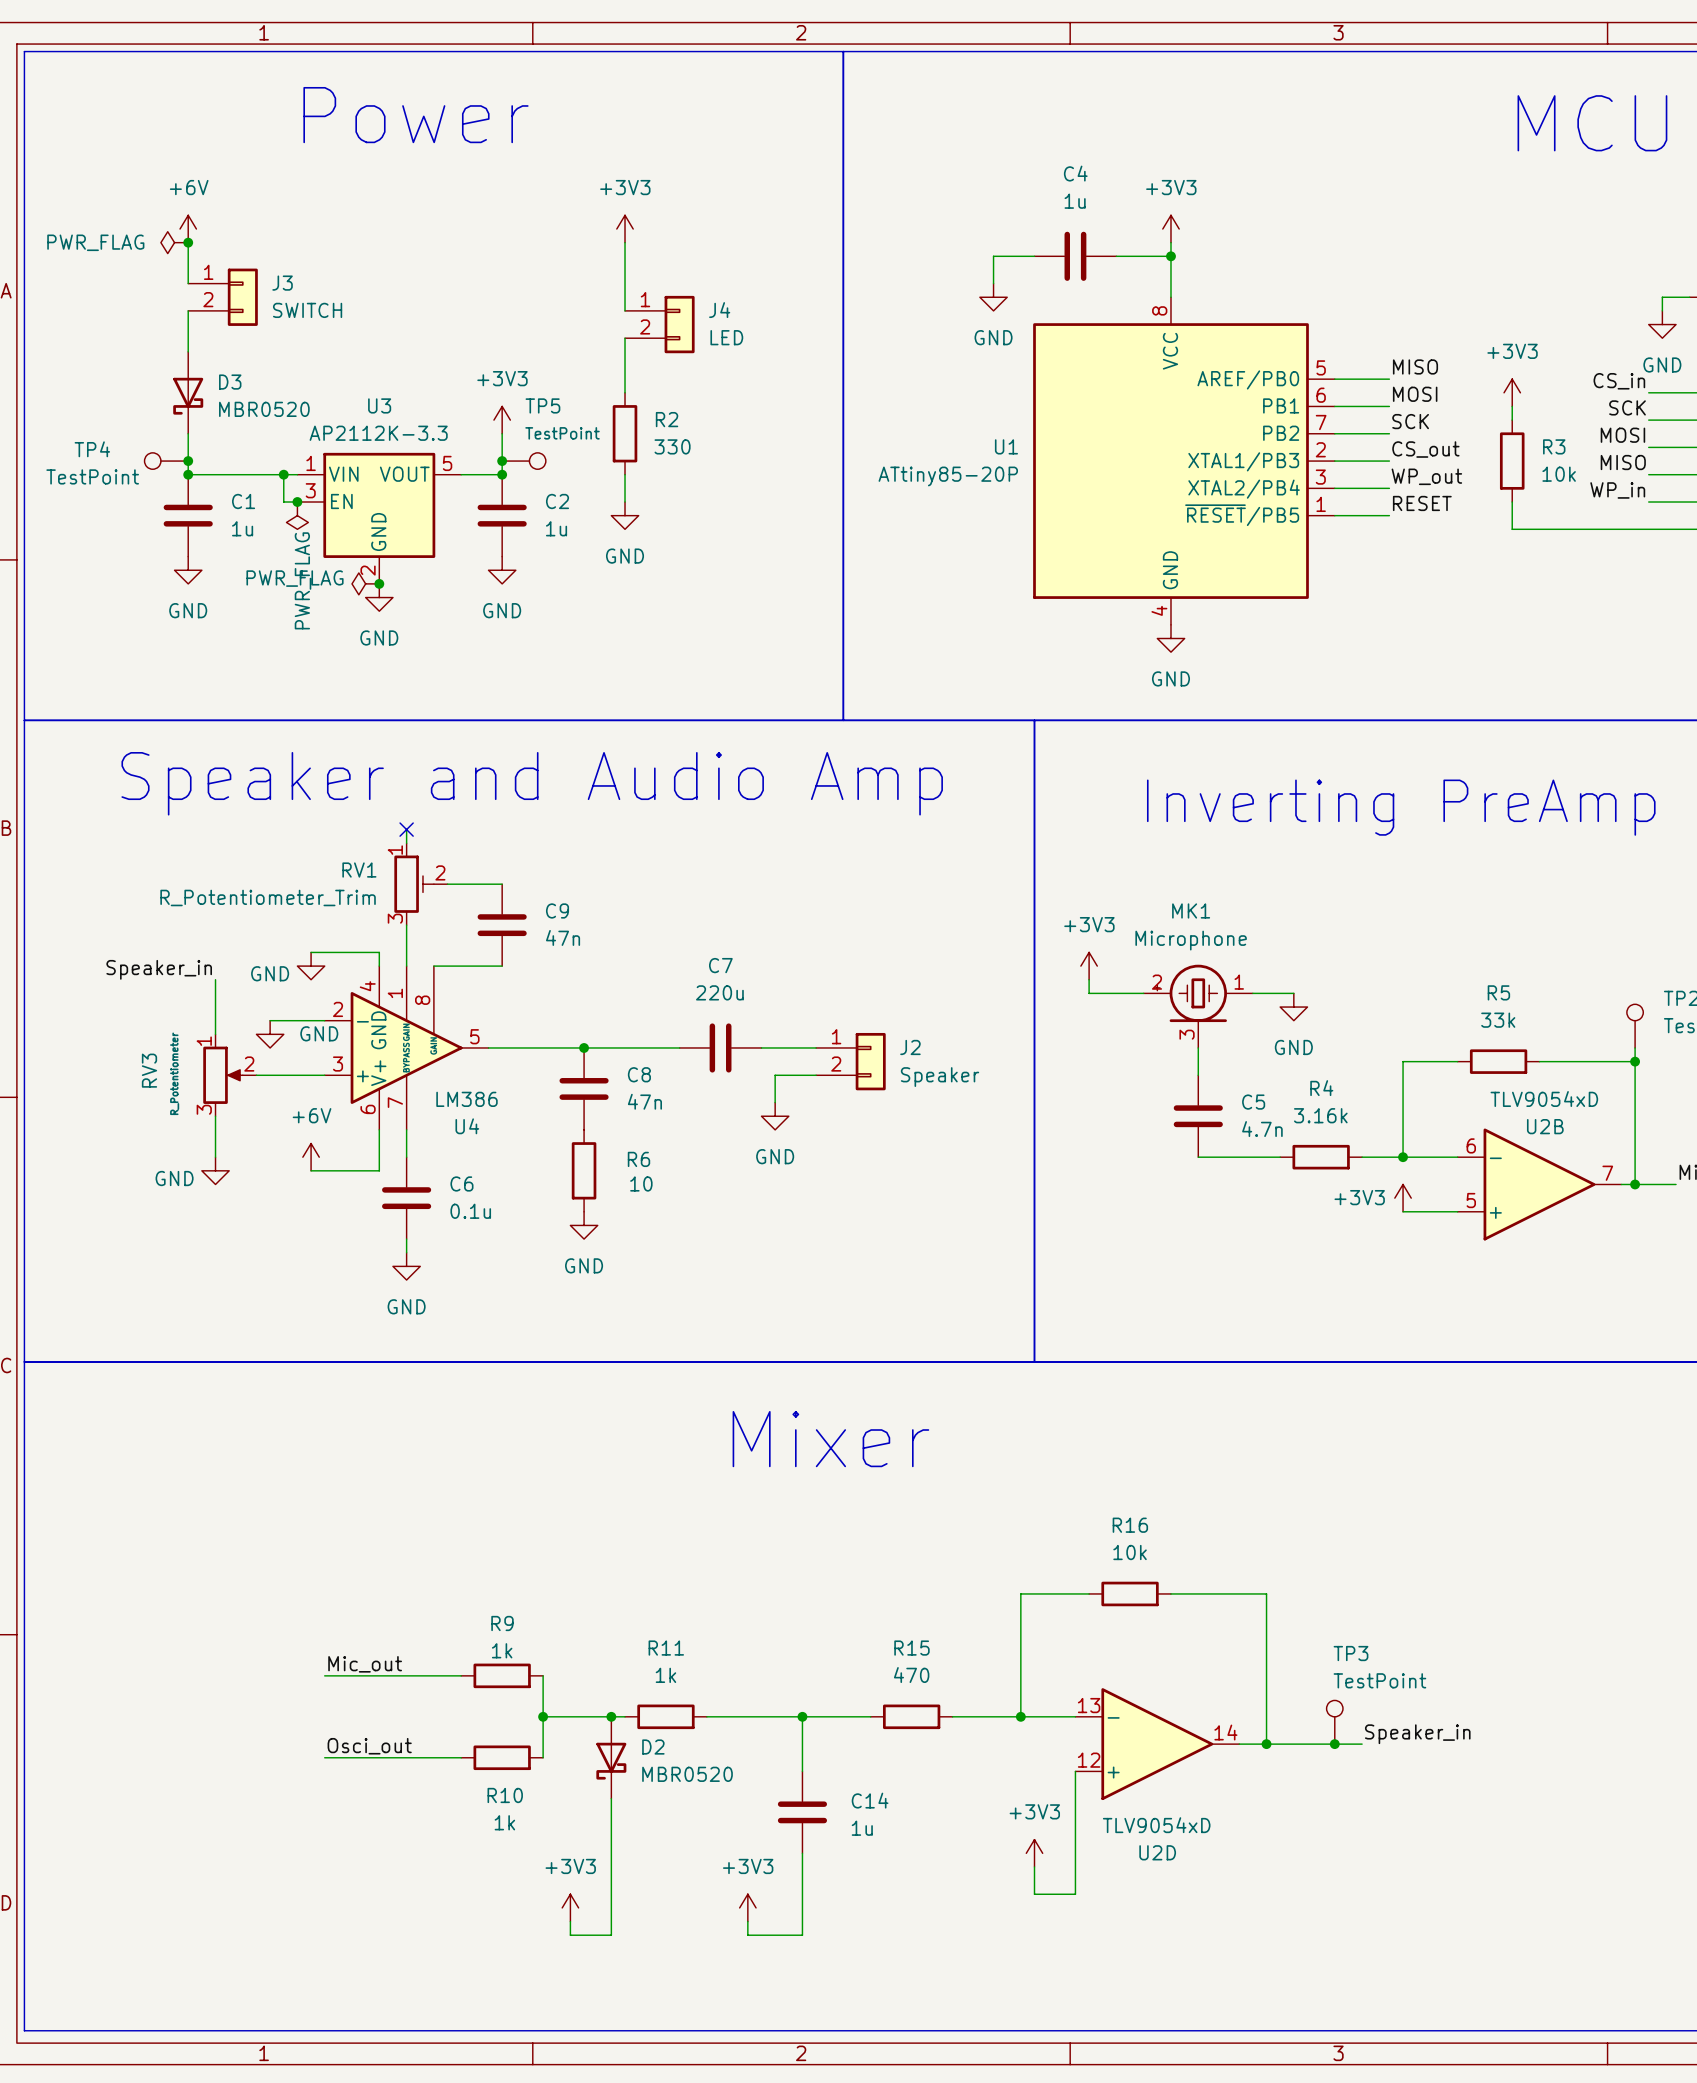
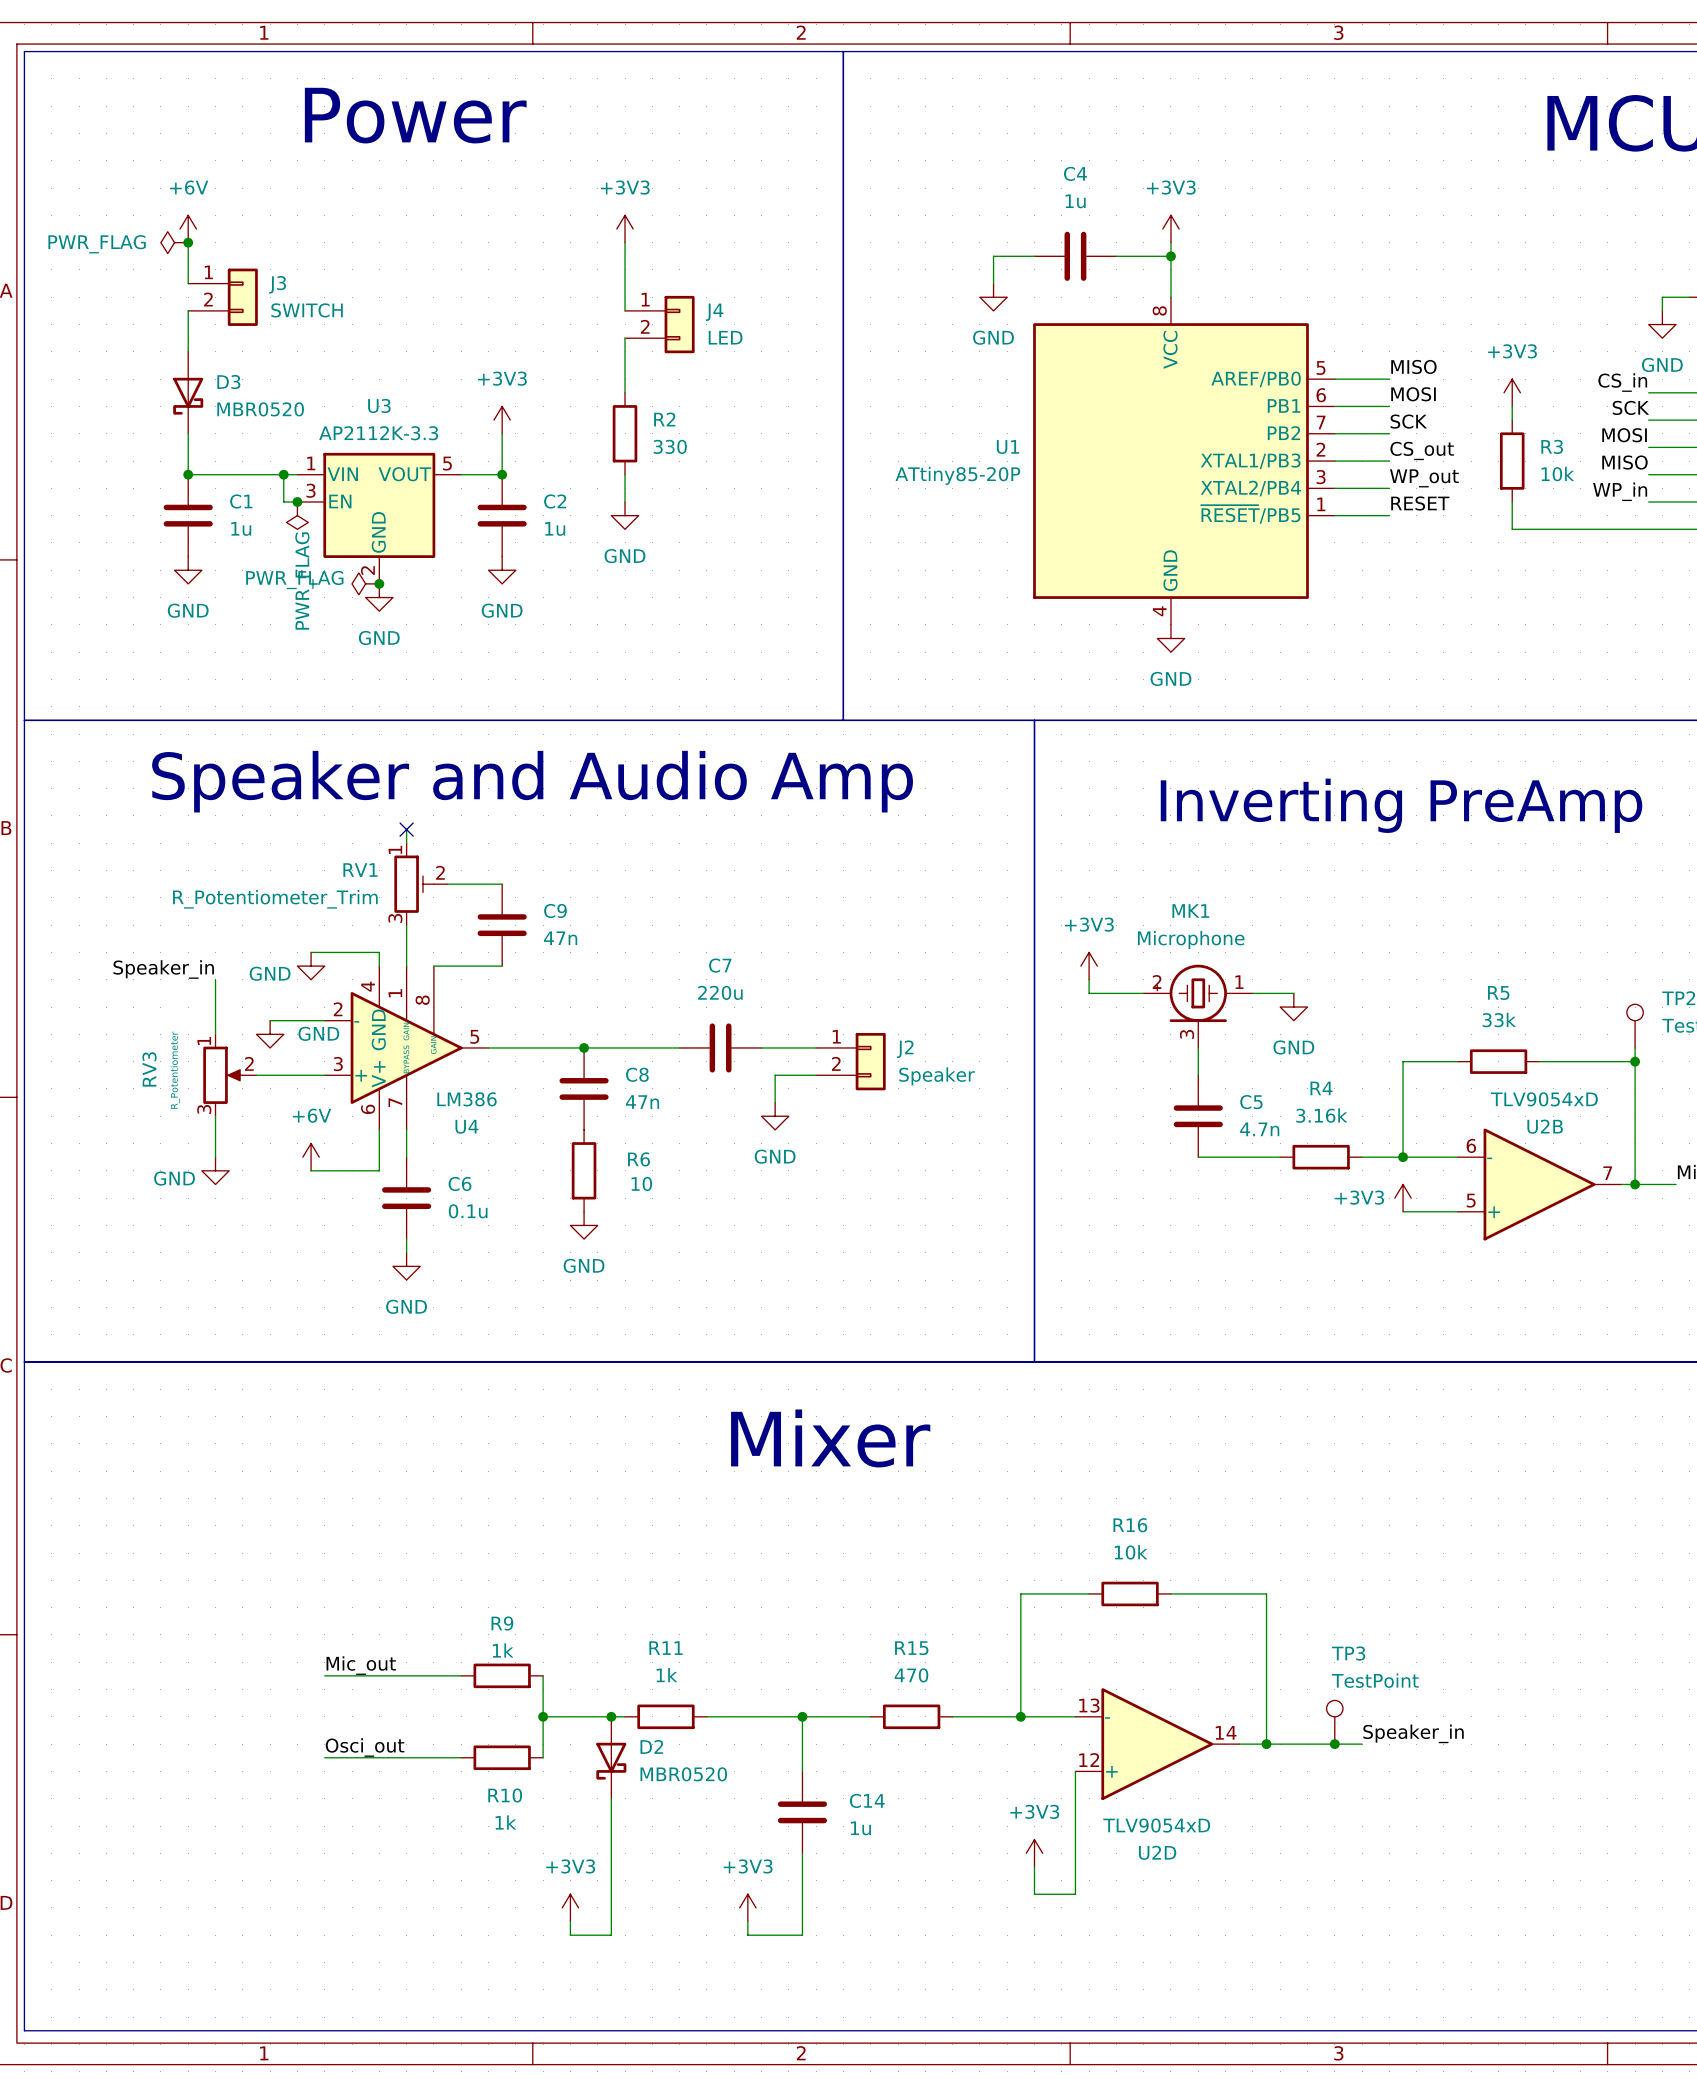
TP4: TestPoint (166, 461) -> none
junction: (188, 461) -> none
junction: (502, 461) -> none
TP5: TestPoint (524, 461) -> none

